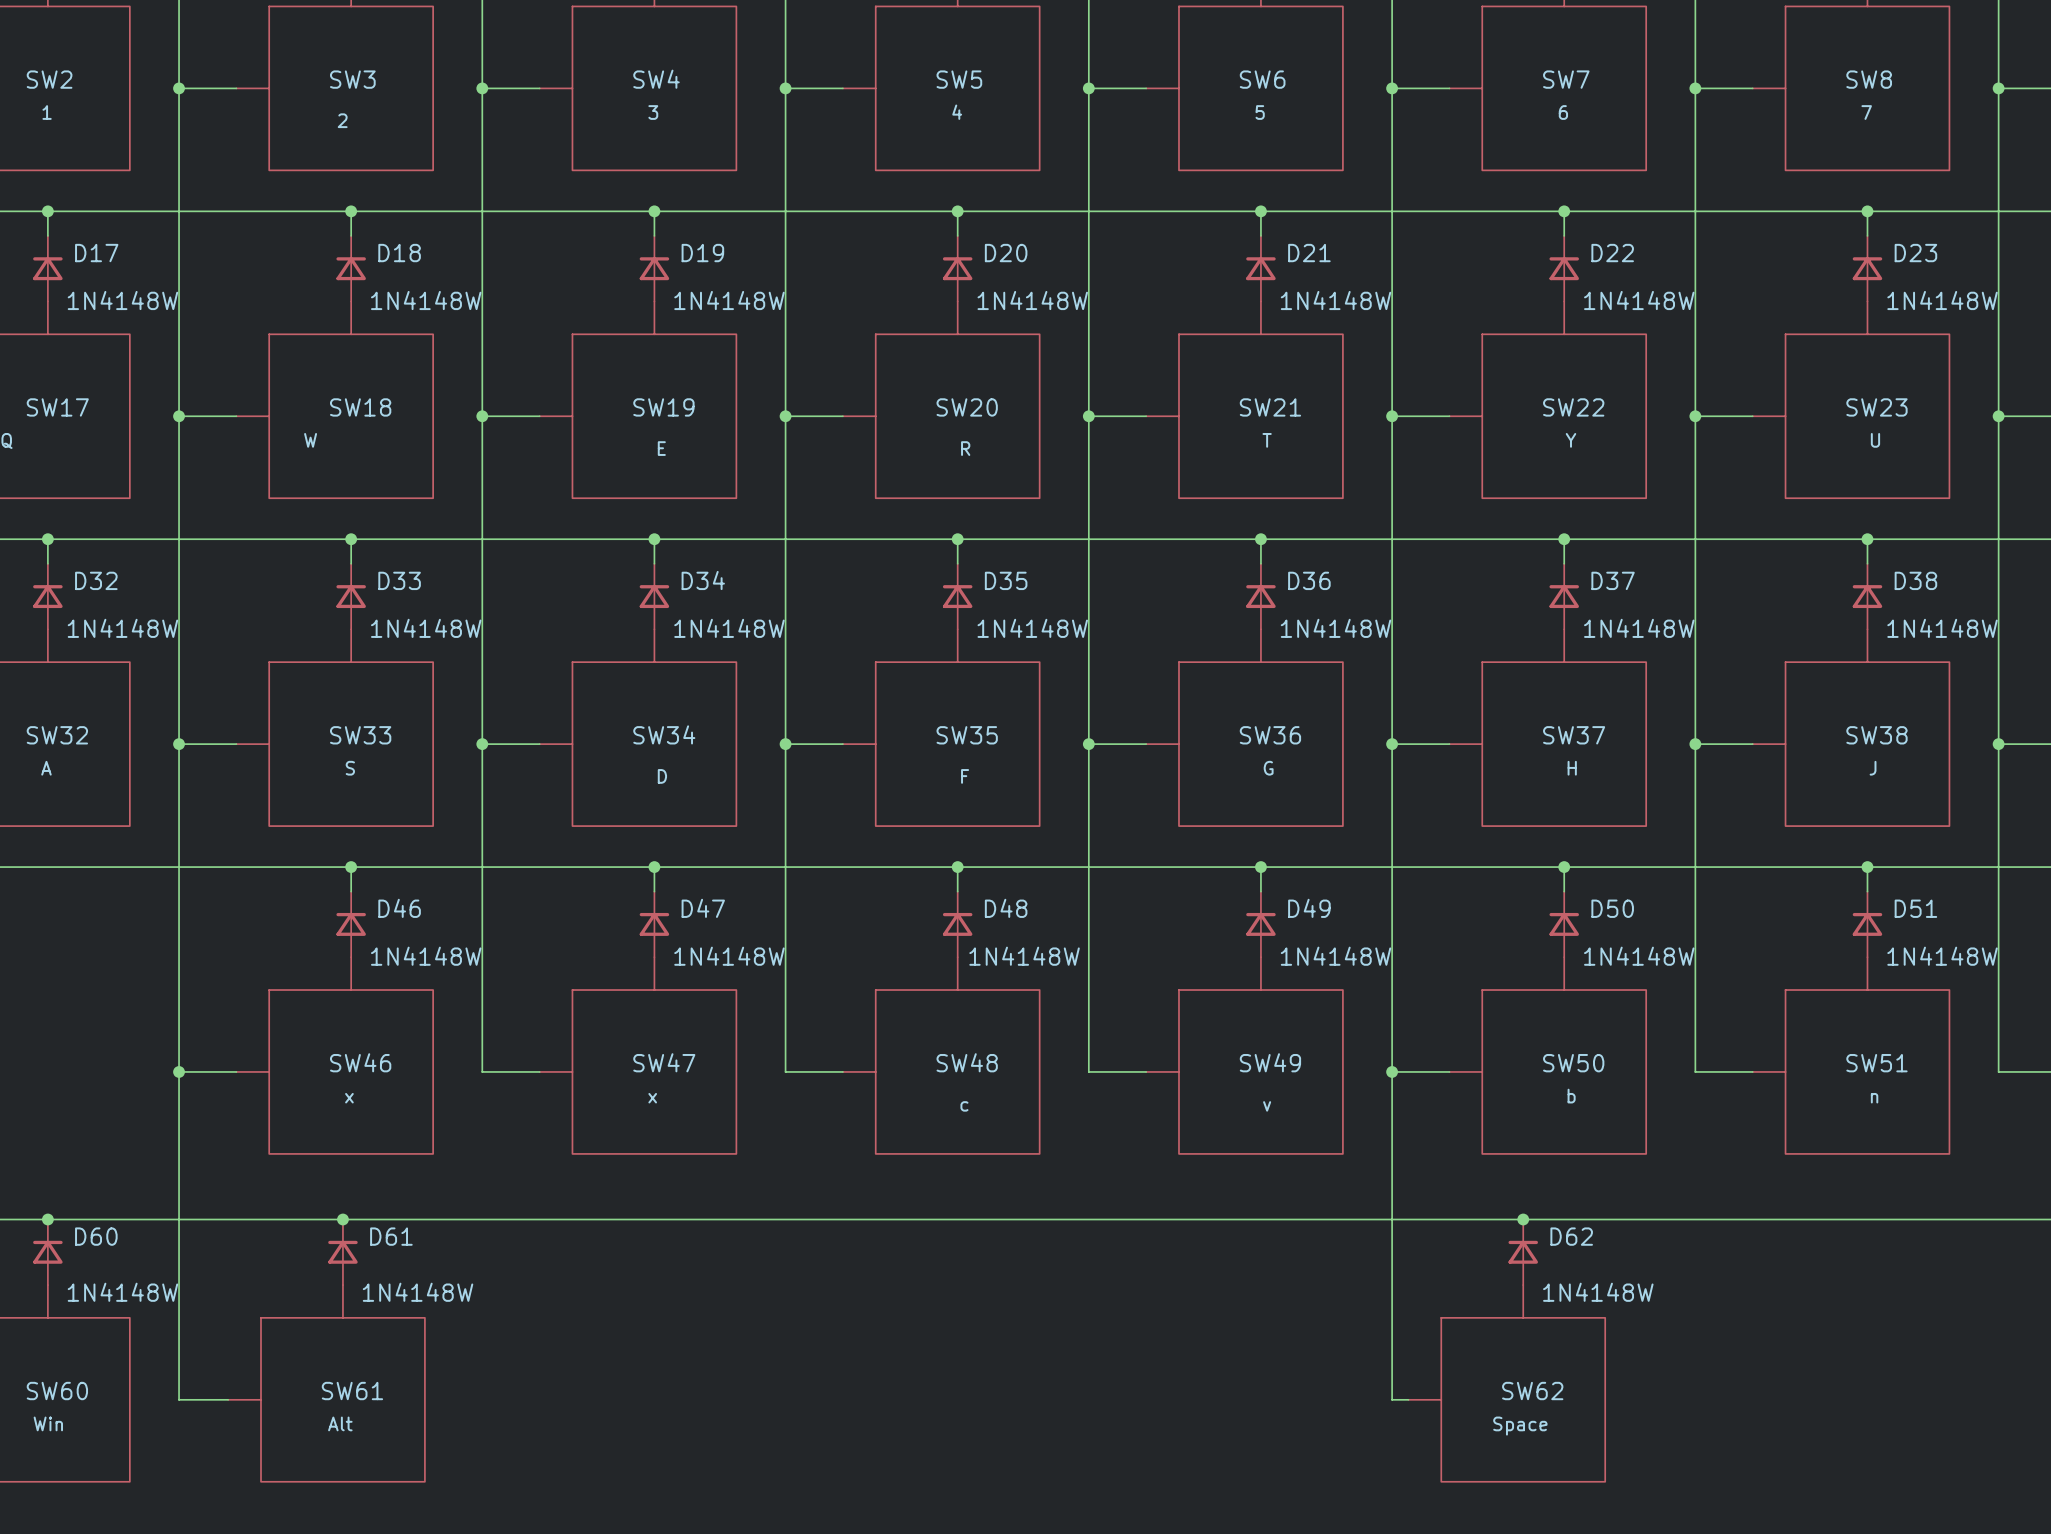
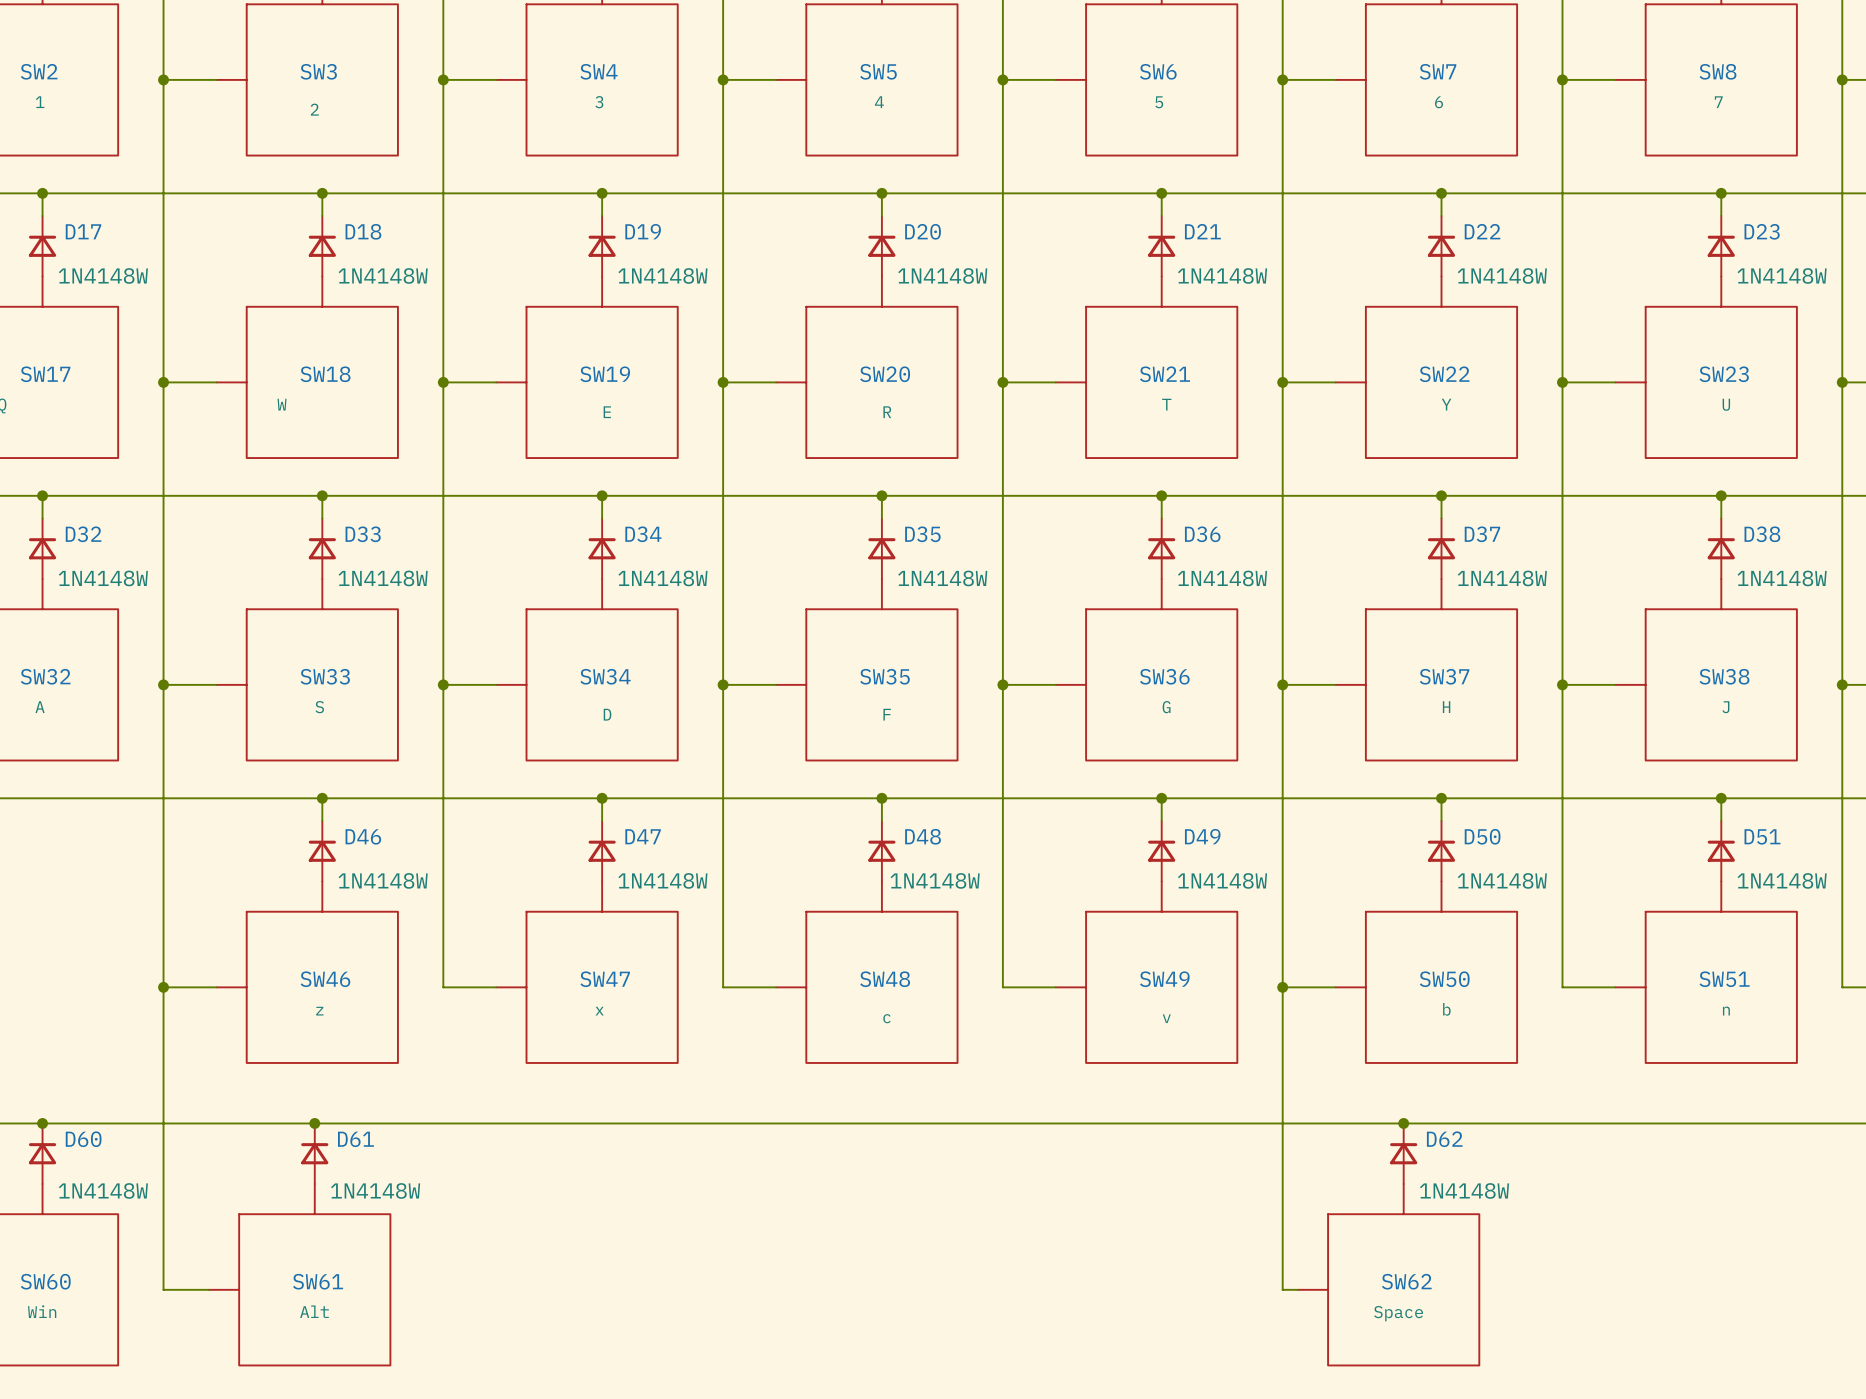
SW46 value: x (349, 1098) -> z (319, 1011)

